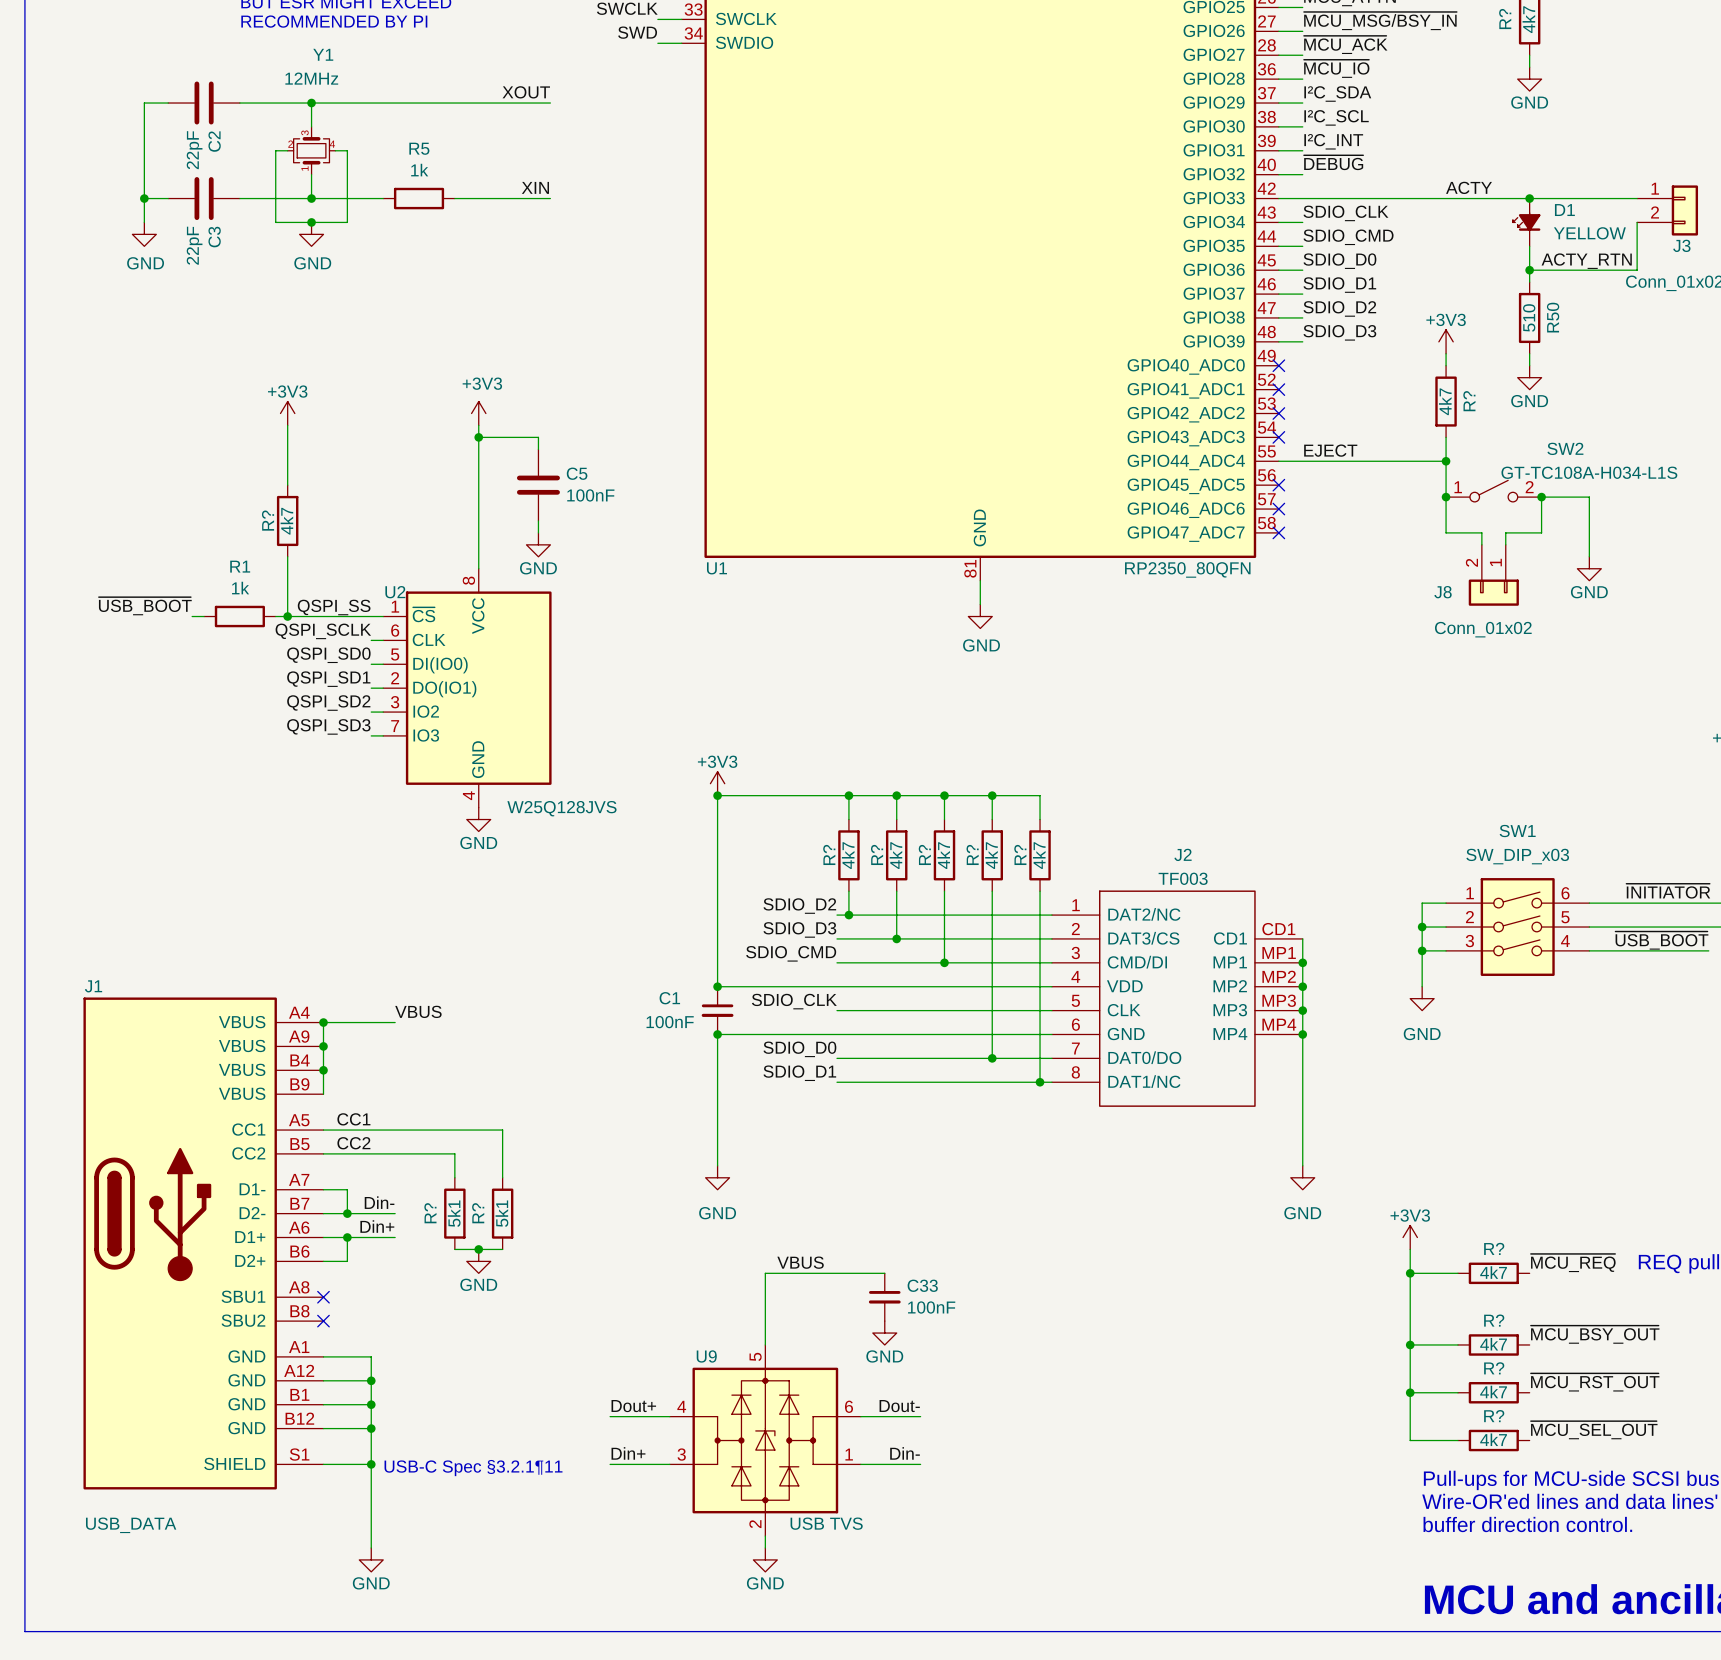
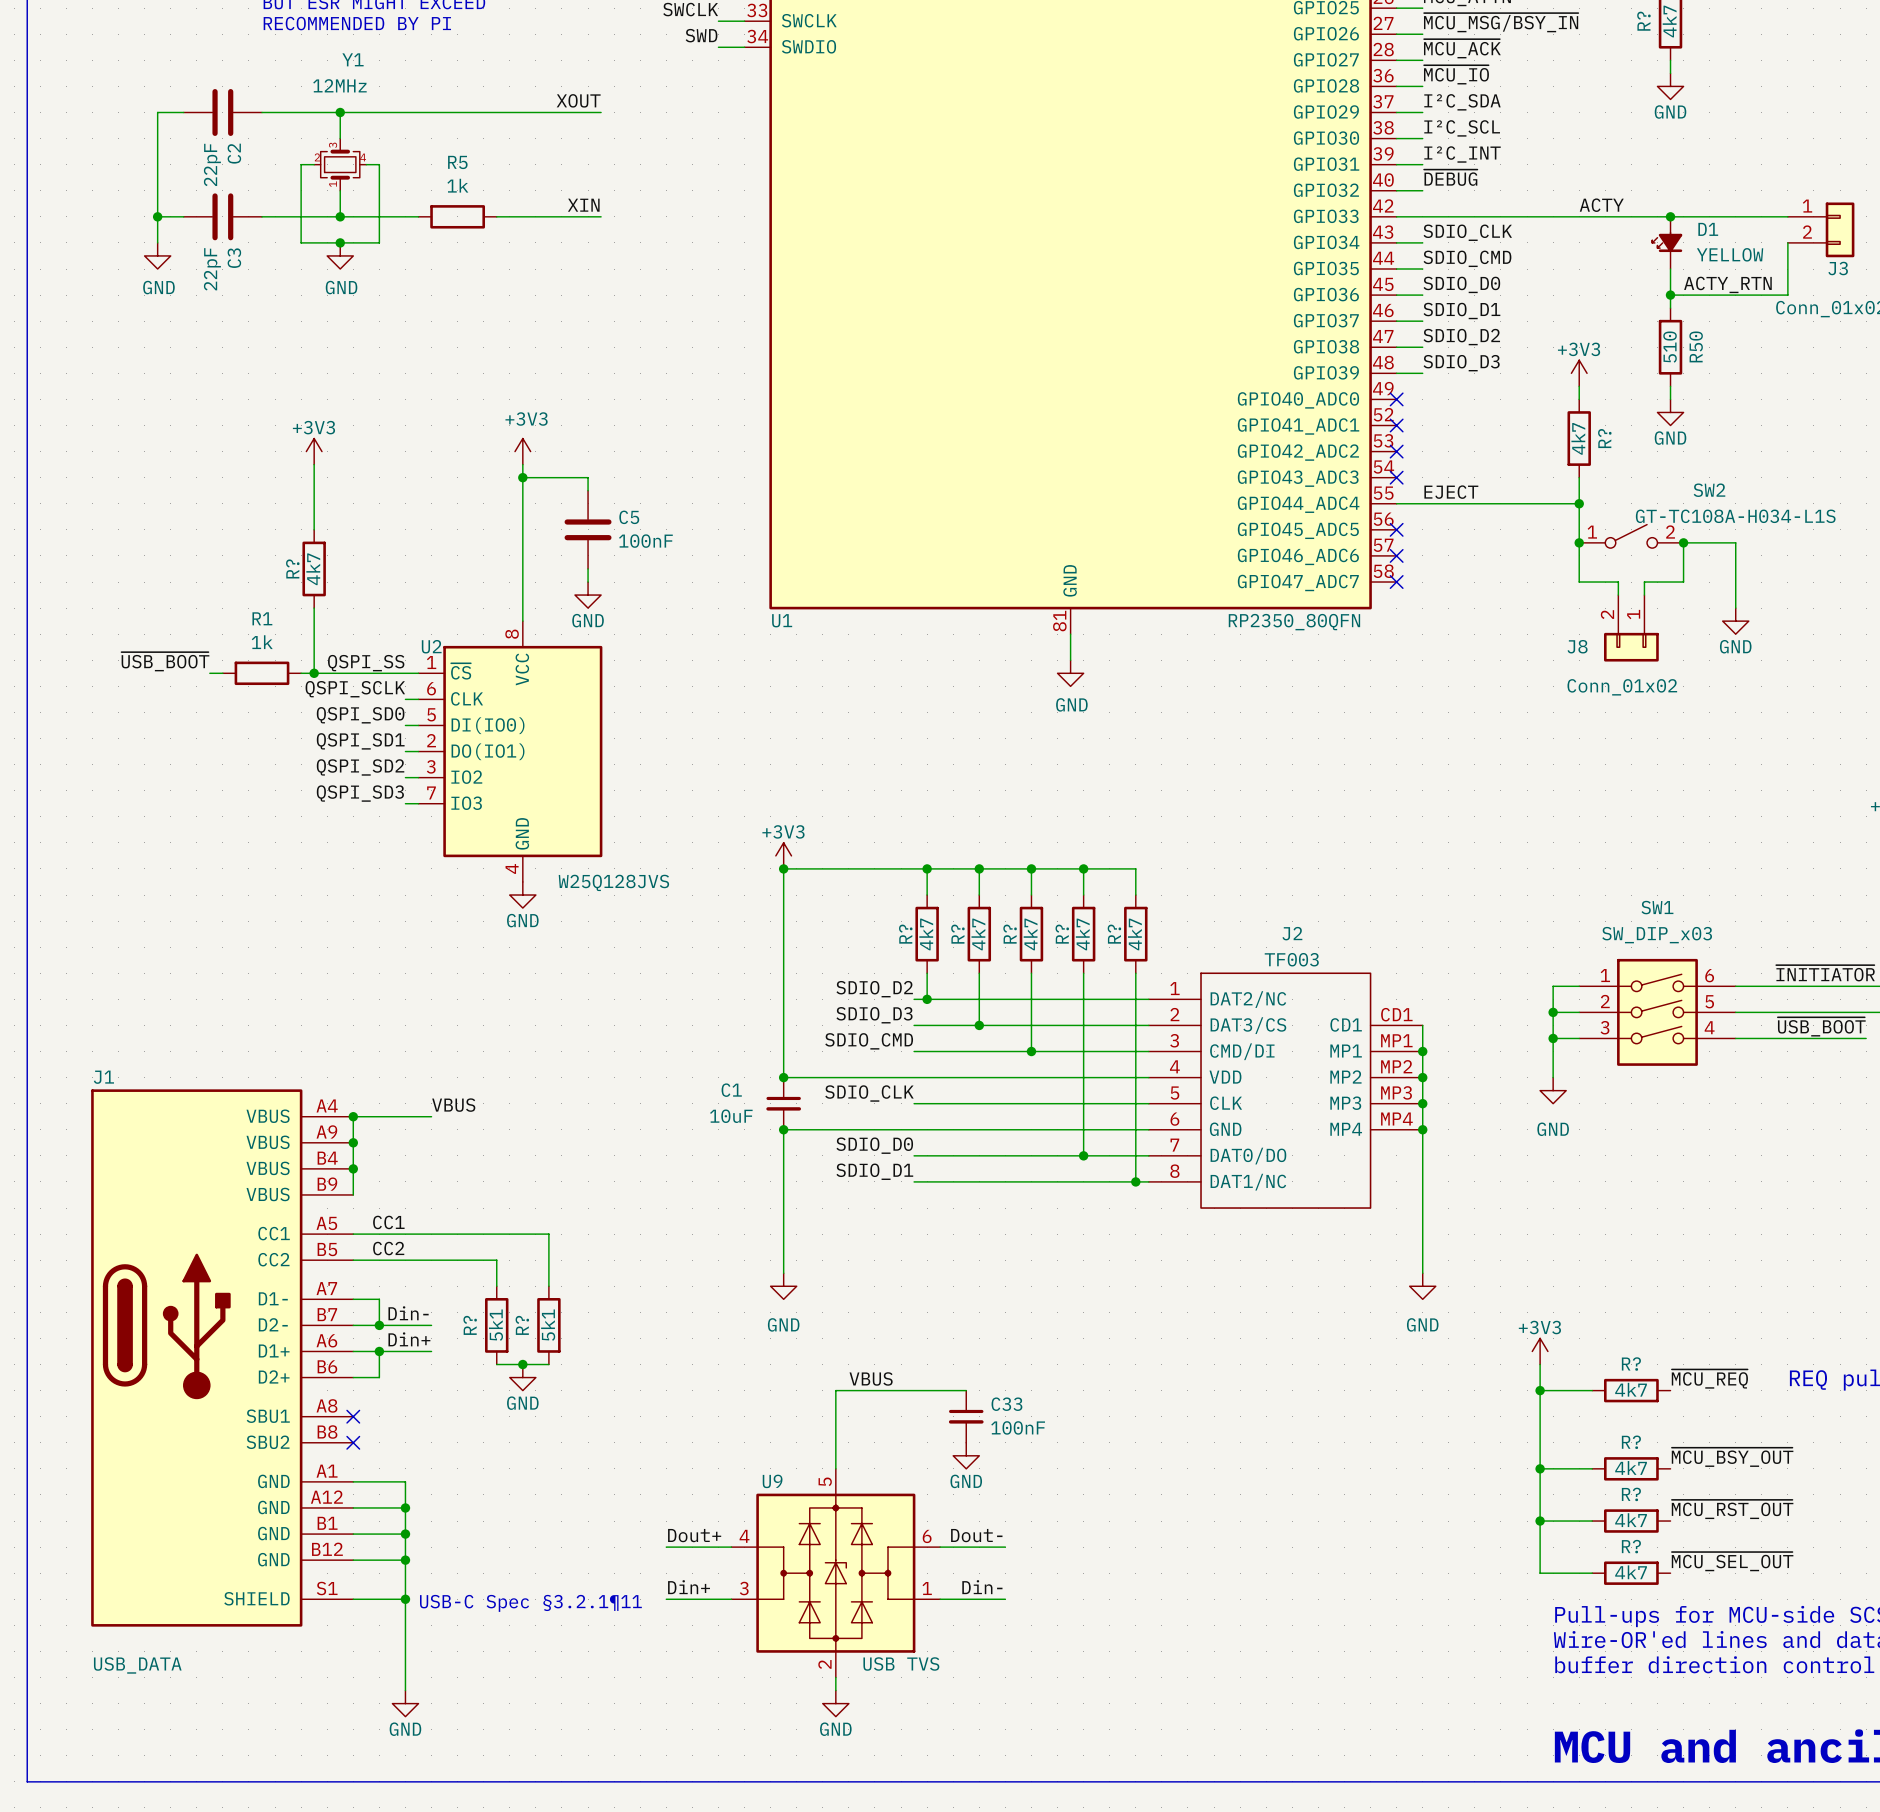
C1 value: 100nF (670, 1022) -> 10uF (731, 1116)

